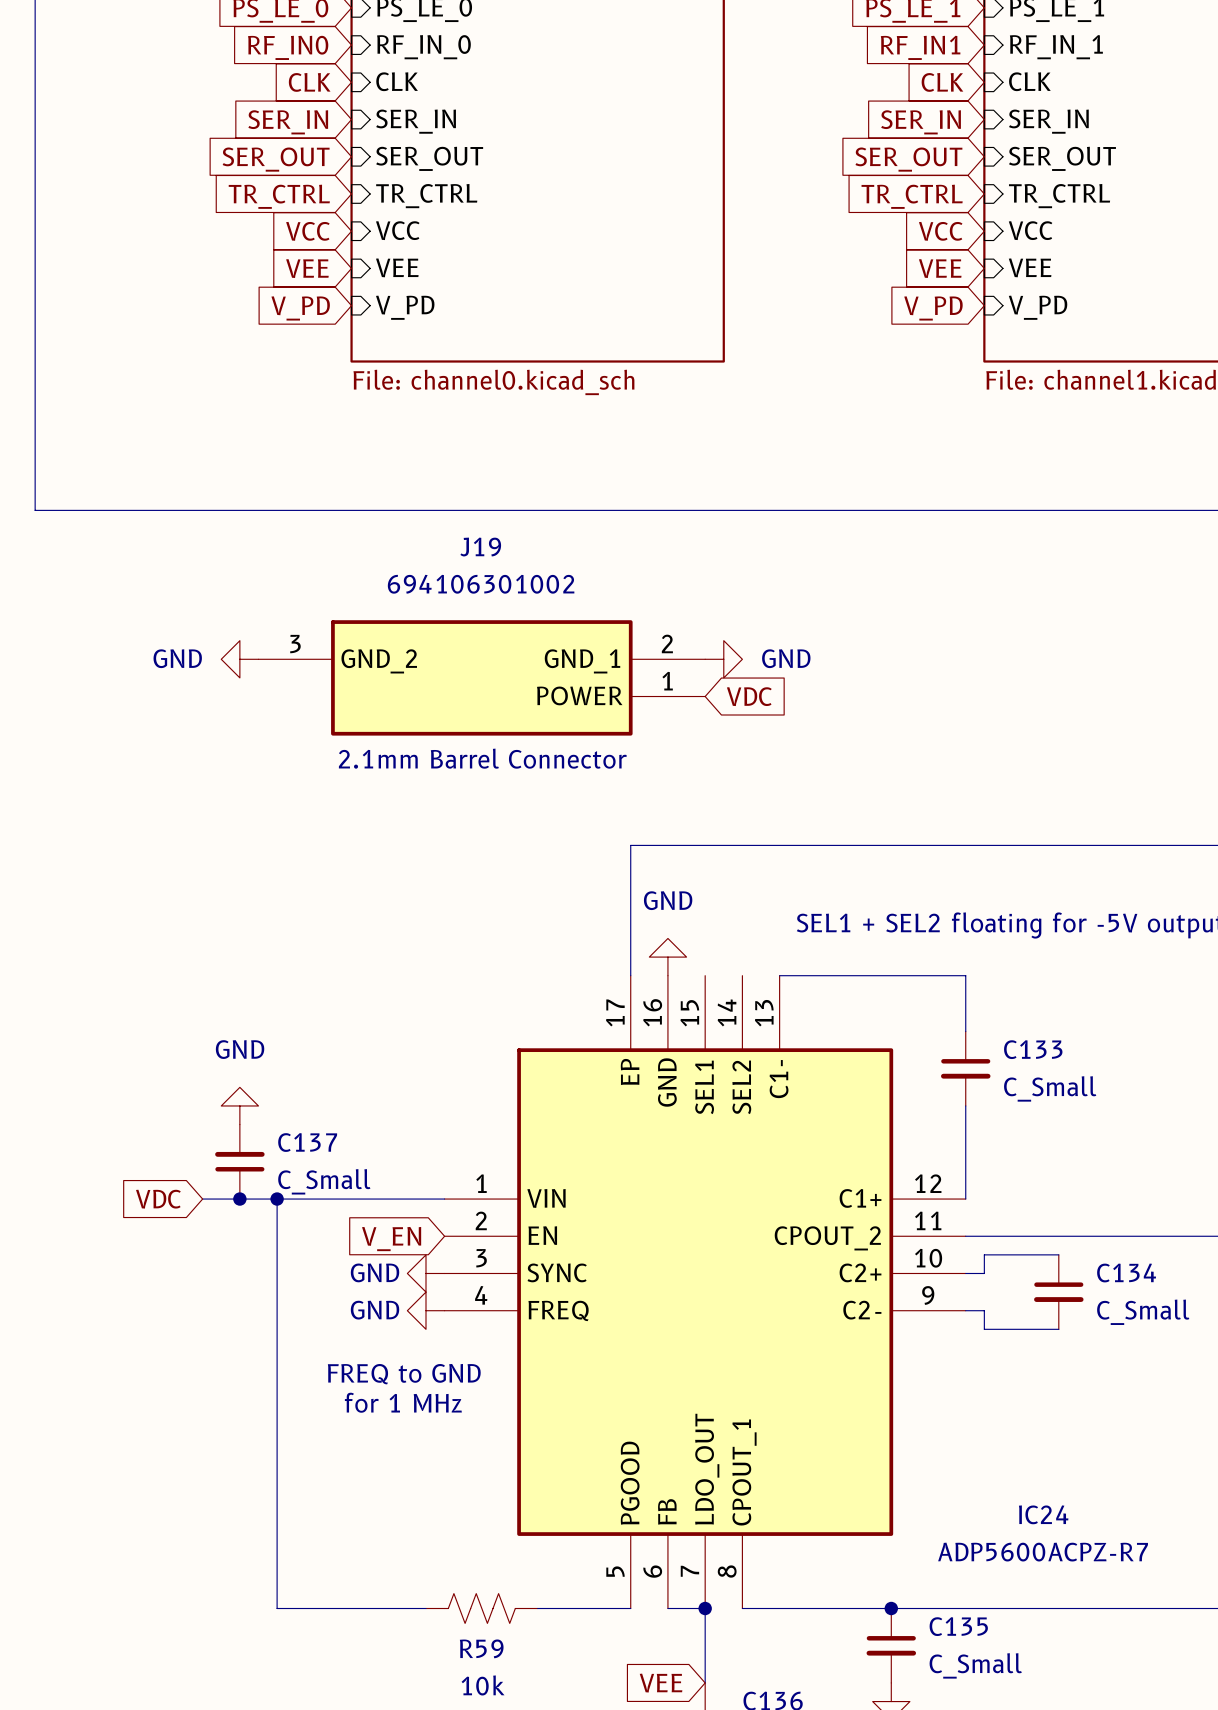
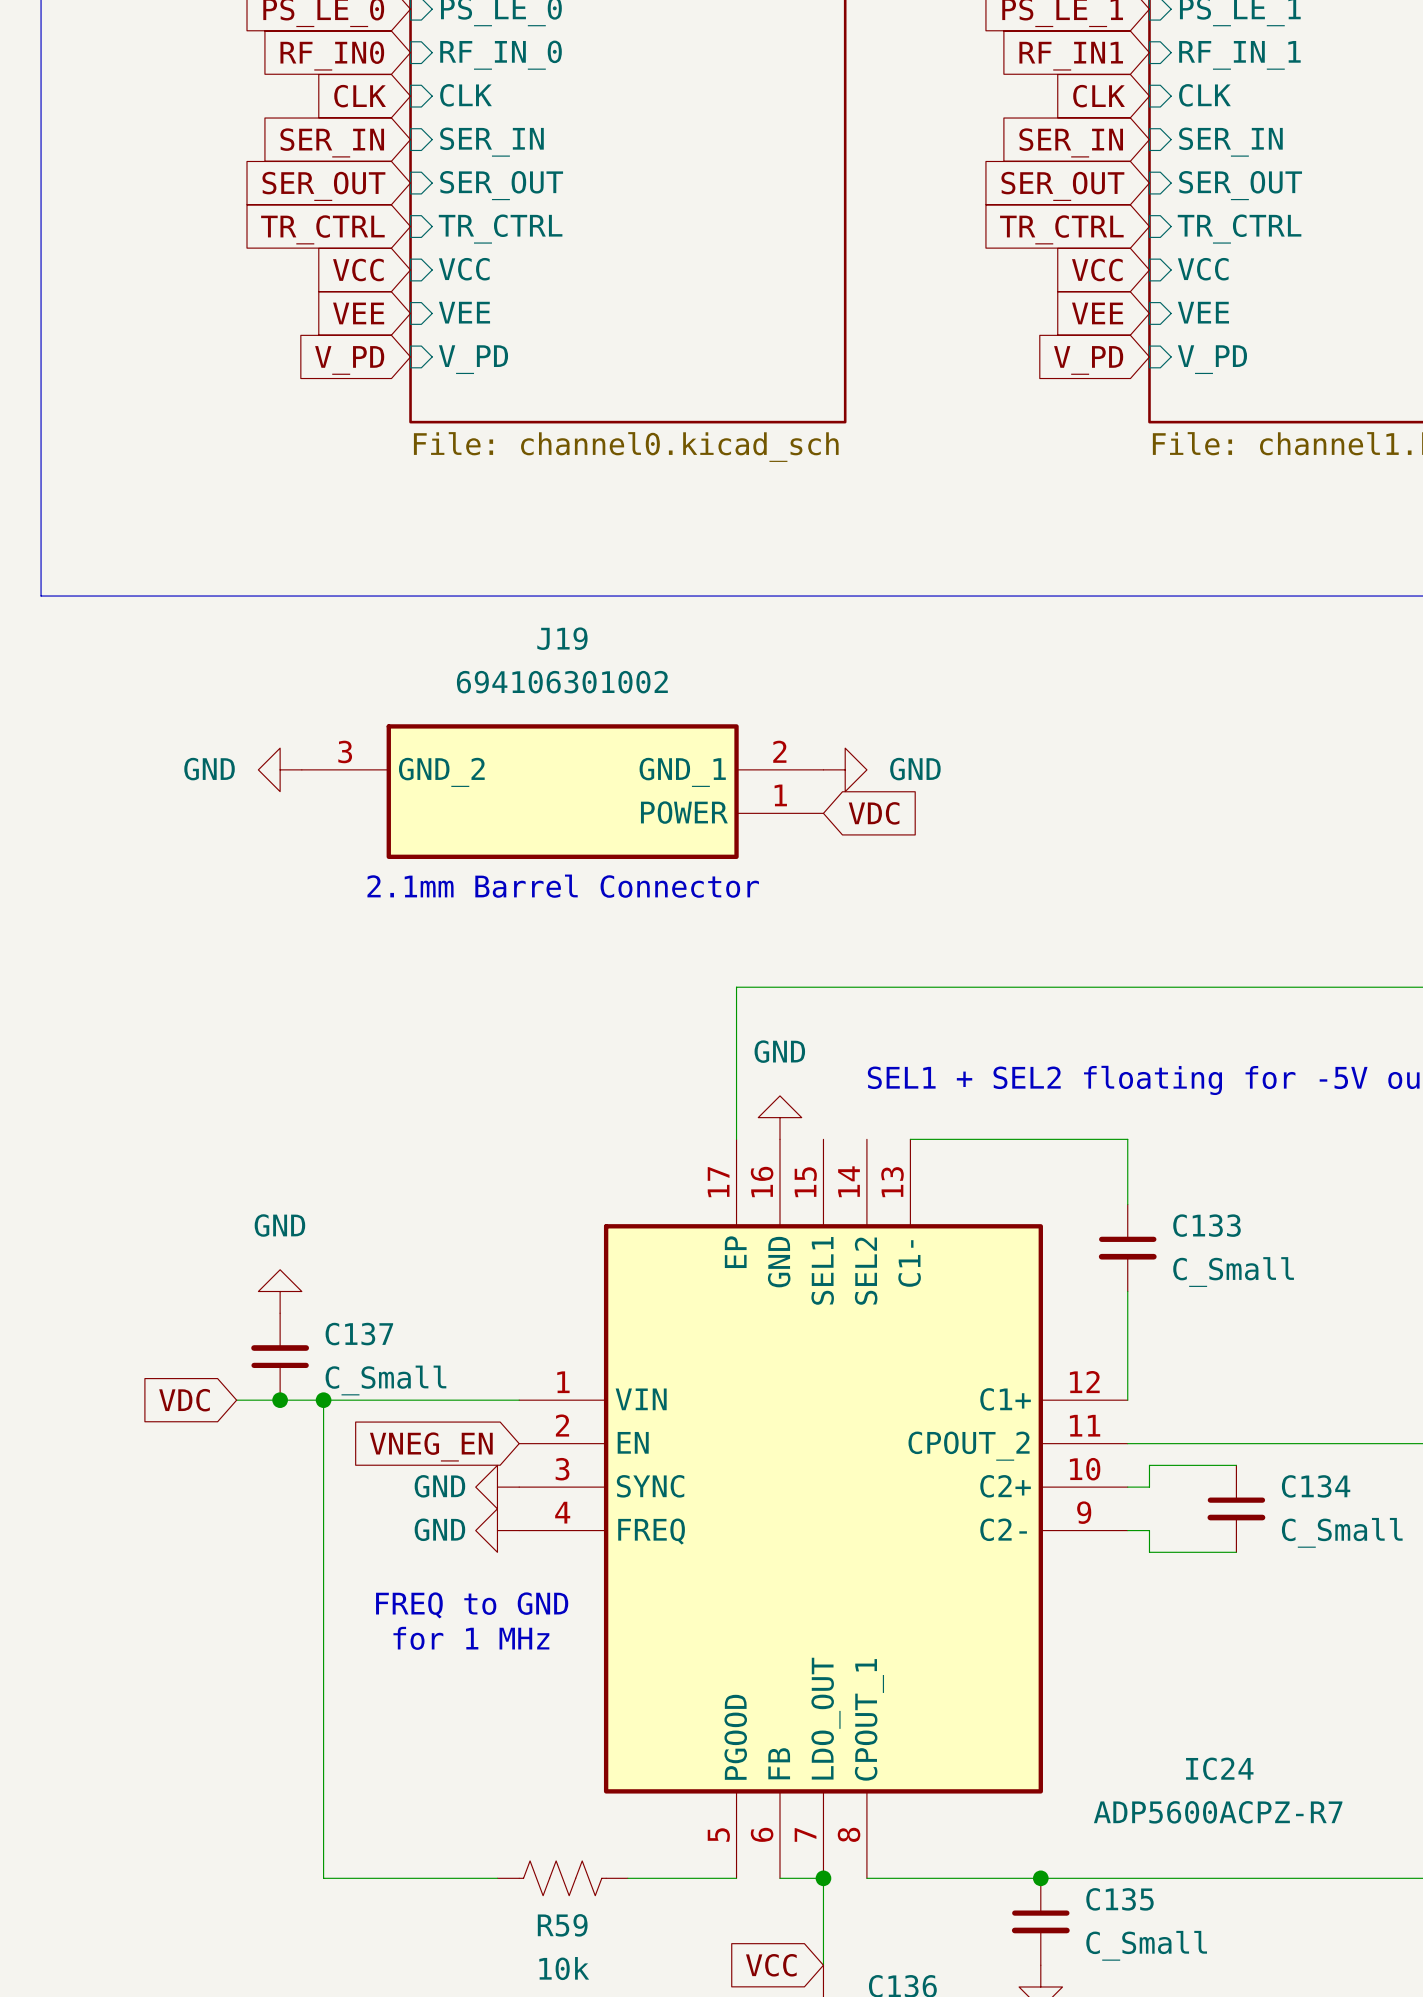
global label: V_EN (391, 1239) -> VNEG_EN (431, 1446)
global label: VEE (661, 1683) -> VCC (771, 1965)

